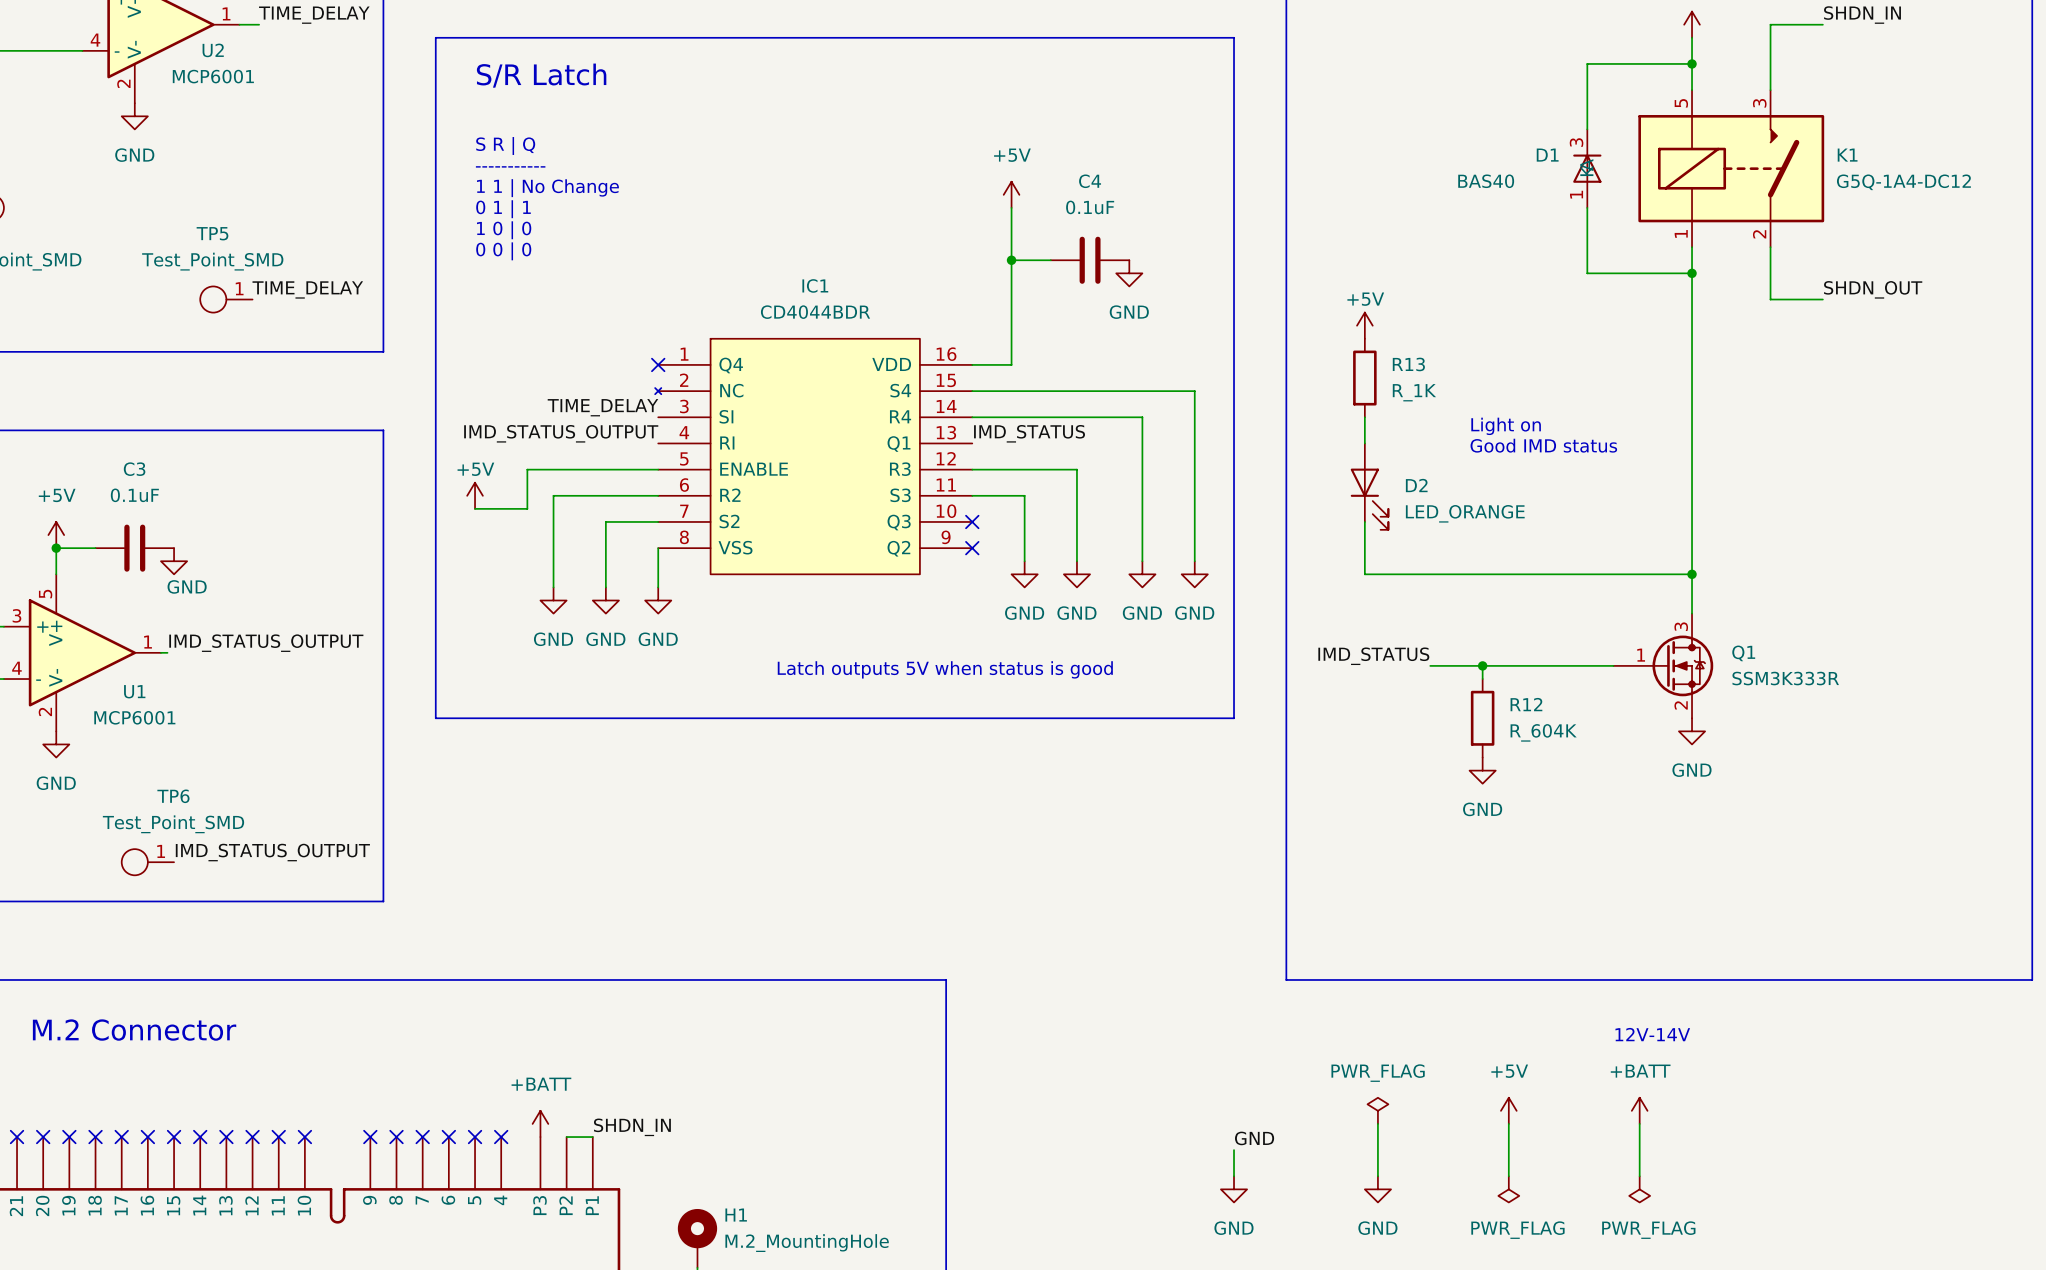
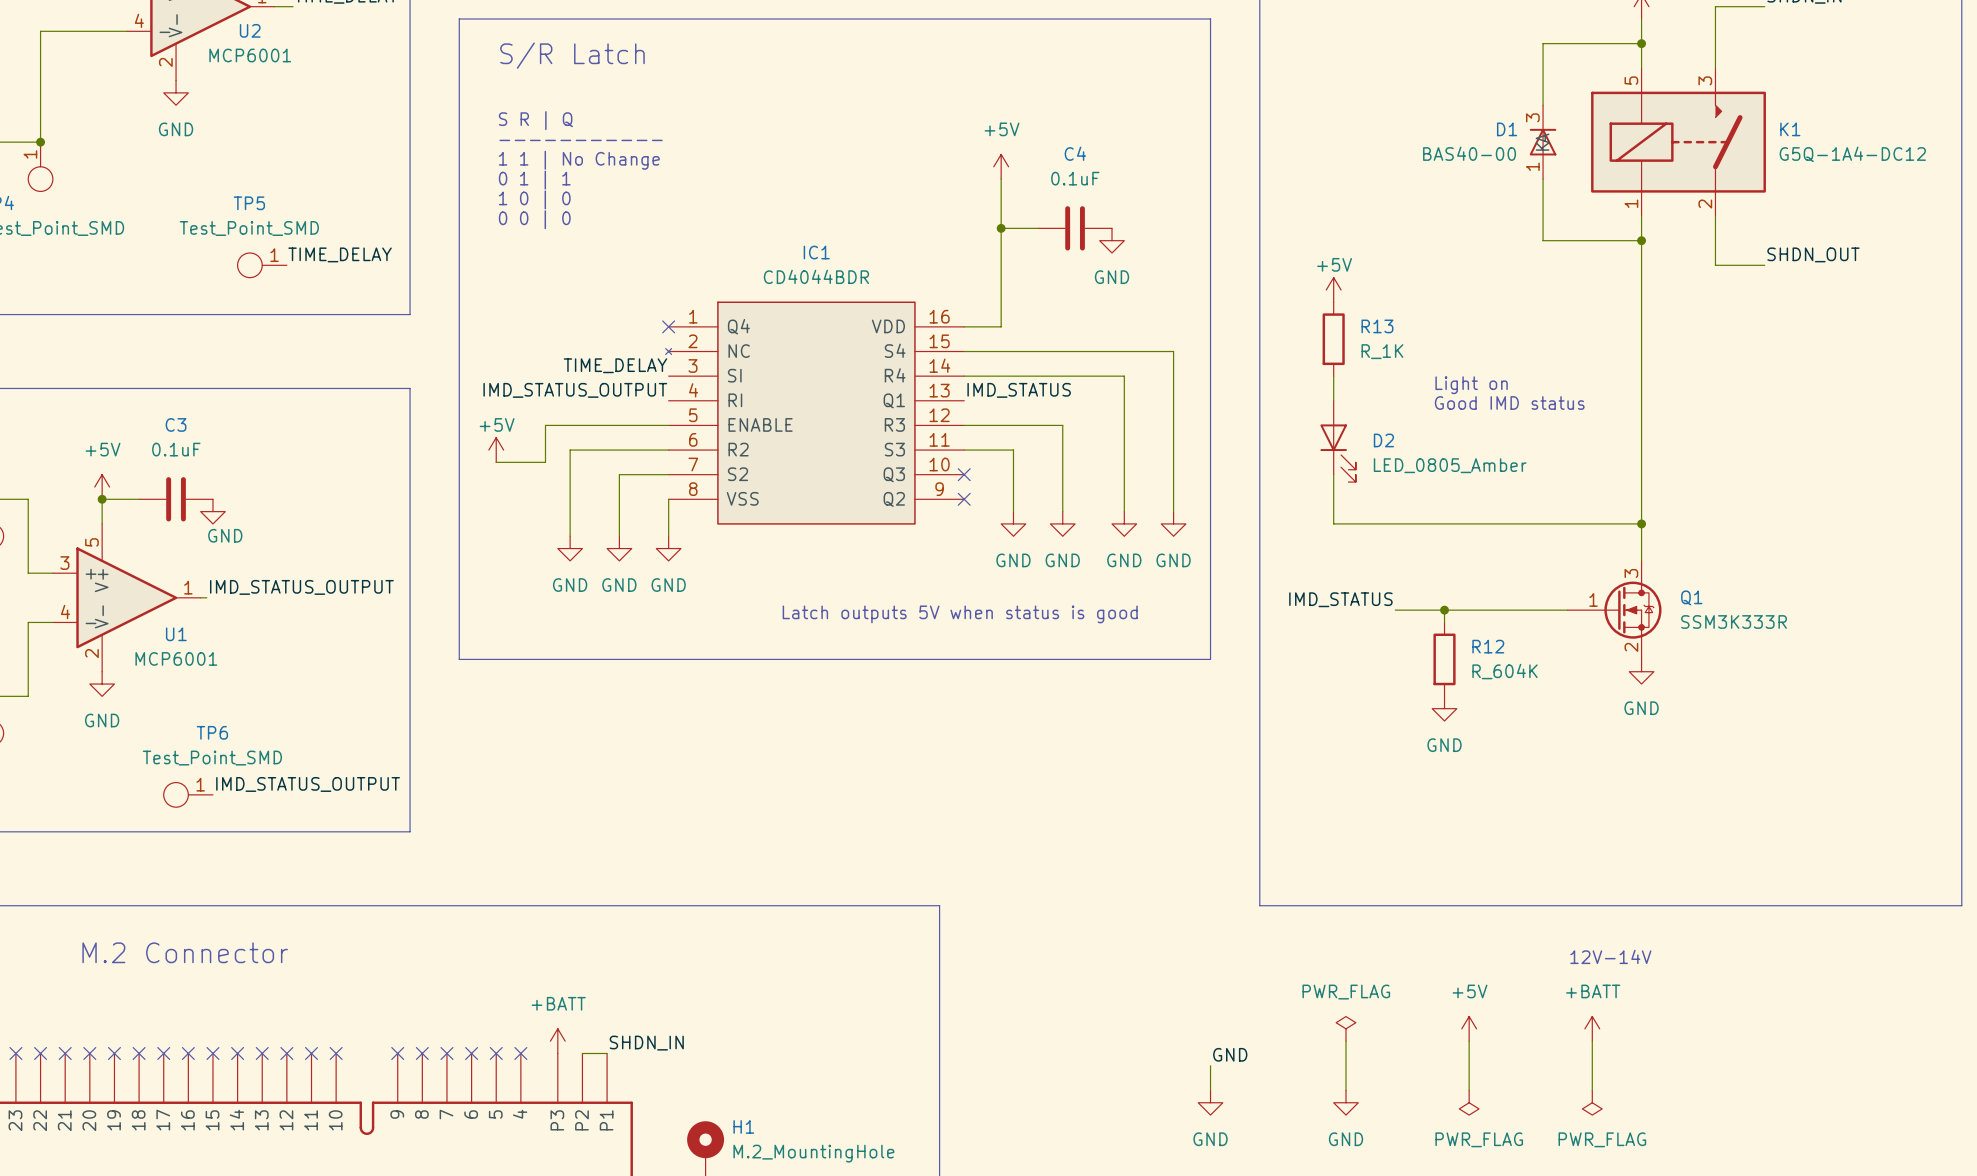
D1 value: BAS40 (1486, 181) -> BAS40-00 (1469, 153)
D2 value: LED_ORANGE (1465, 513) -> LED_0805_Amber (1450, 465)

